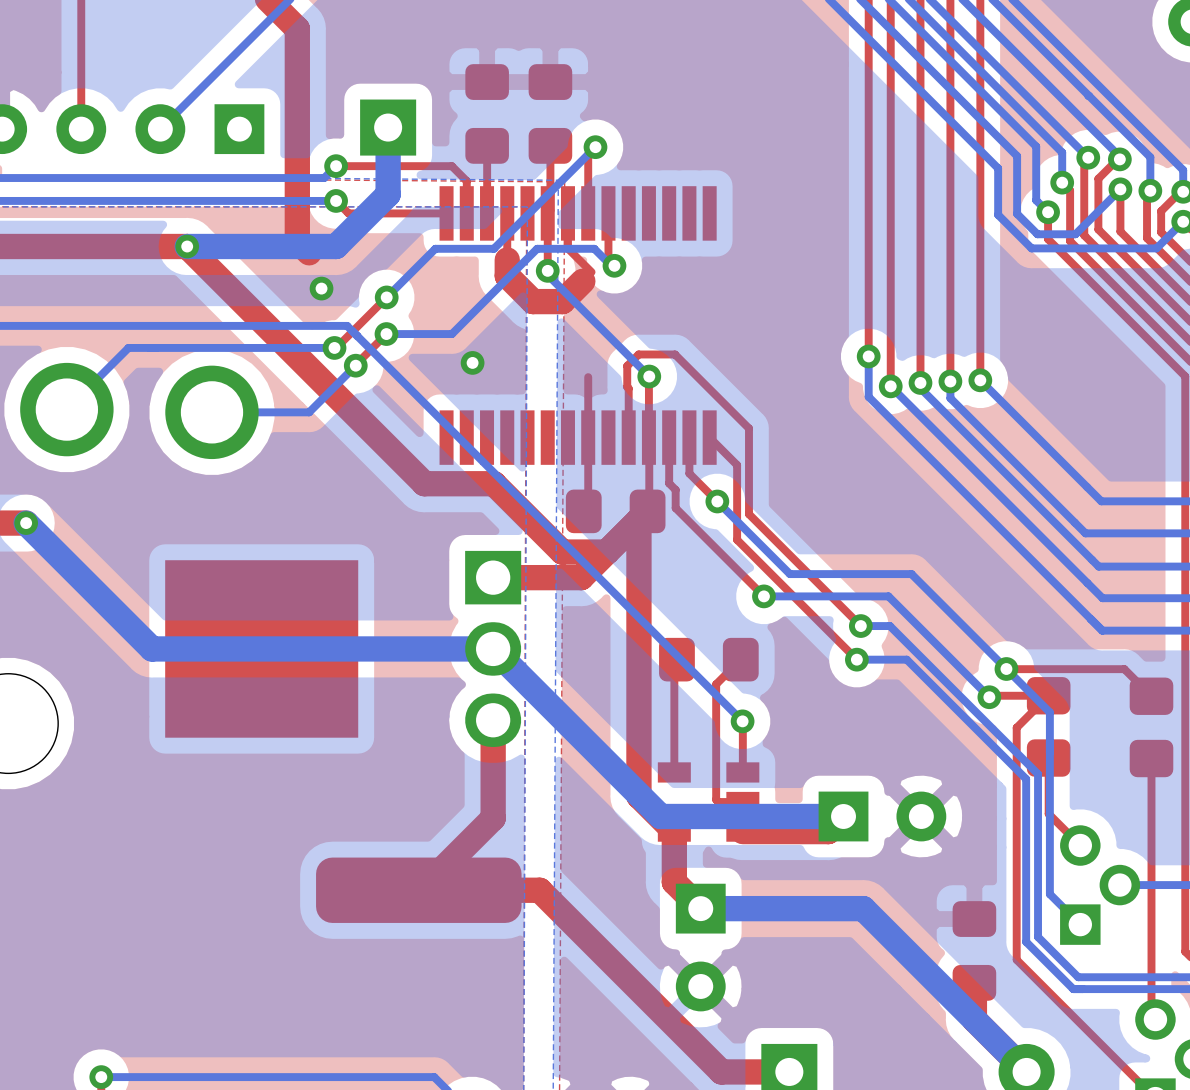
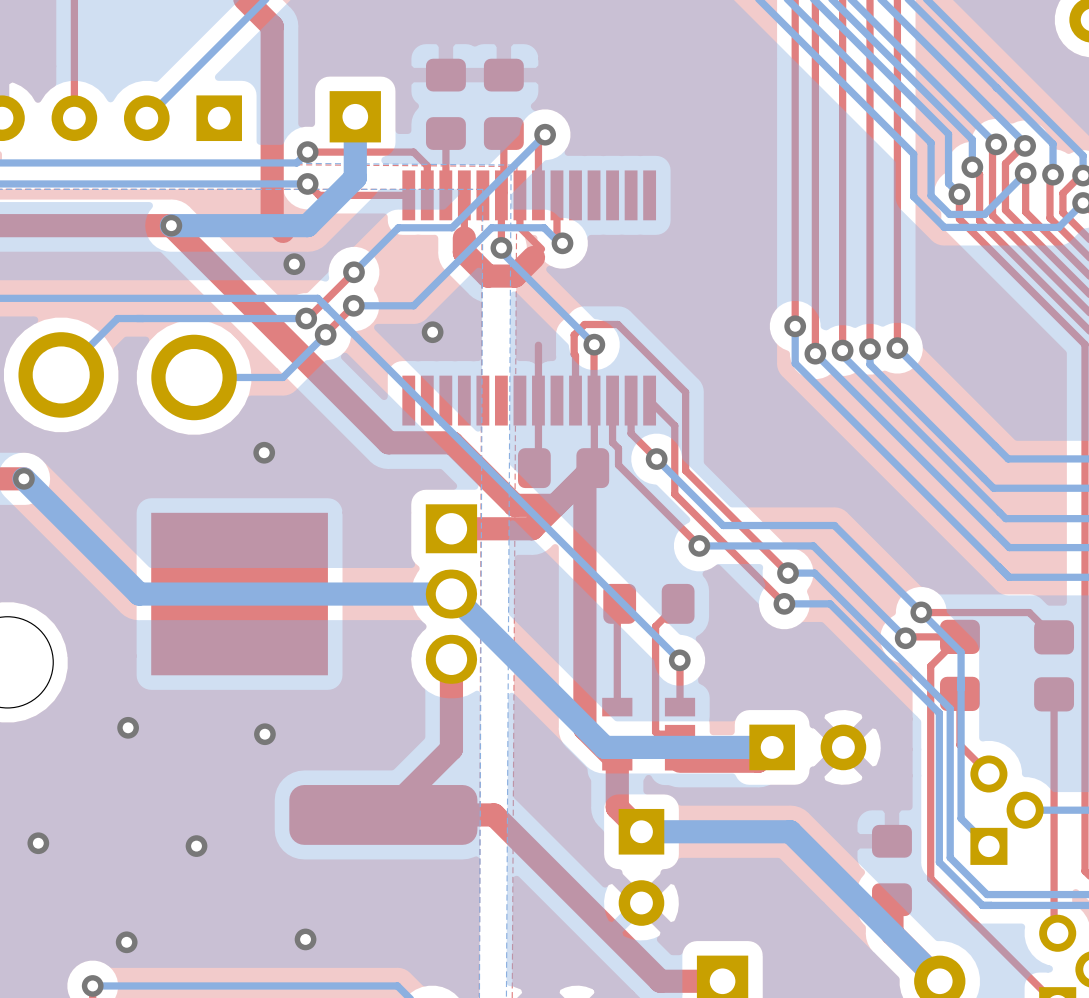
via: none -> (264, 452)
via: none -> (128, 727)
via: none -> (264, 734)
via: none -> (38, 843)
via: none -> (196, 846)
via: none -> (305, 939)
via: none -> (126, 942)

